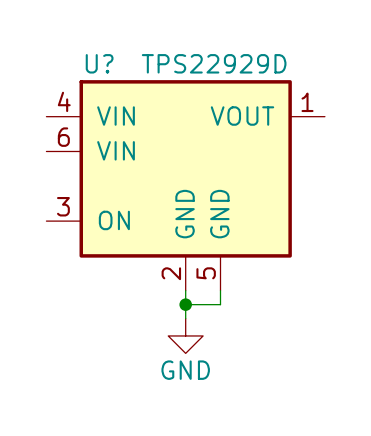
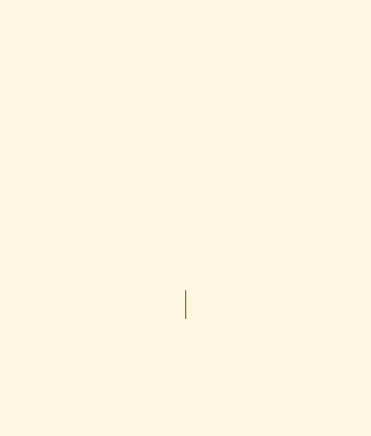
U?: TPS22929D (185, 185) -> none
wire: (220, 290) (220, 304) (185, 304) -> none
junction: (185, 304) -> none
power symbol: GND (185, 335) -> none

